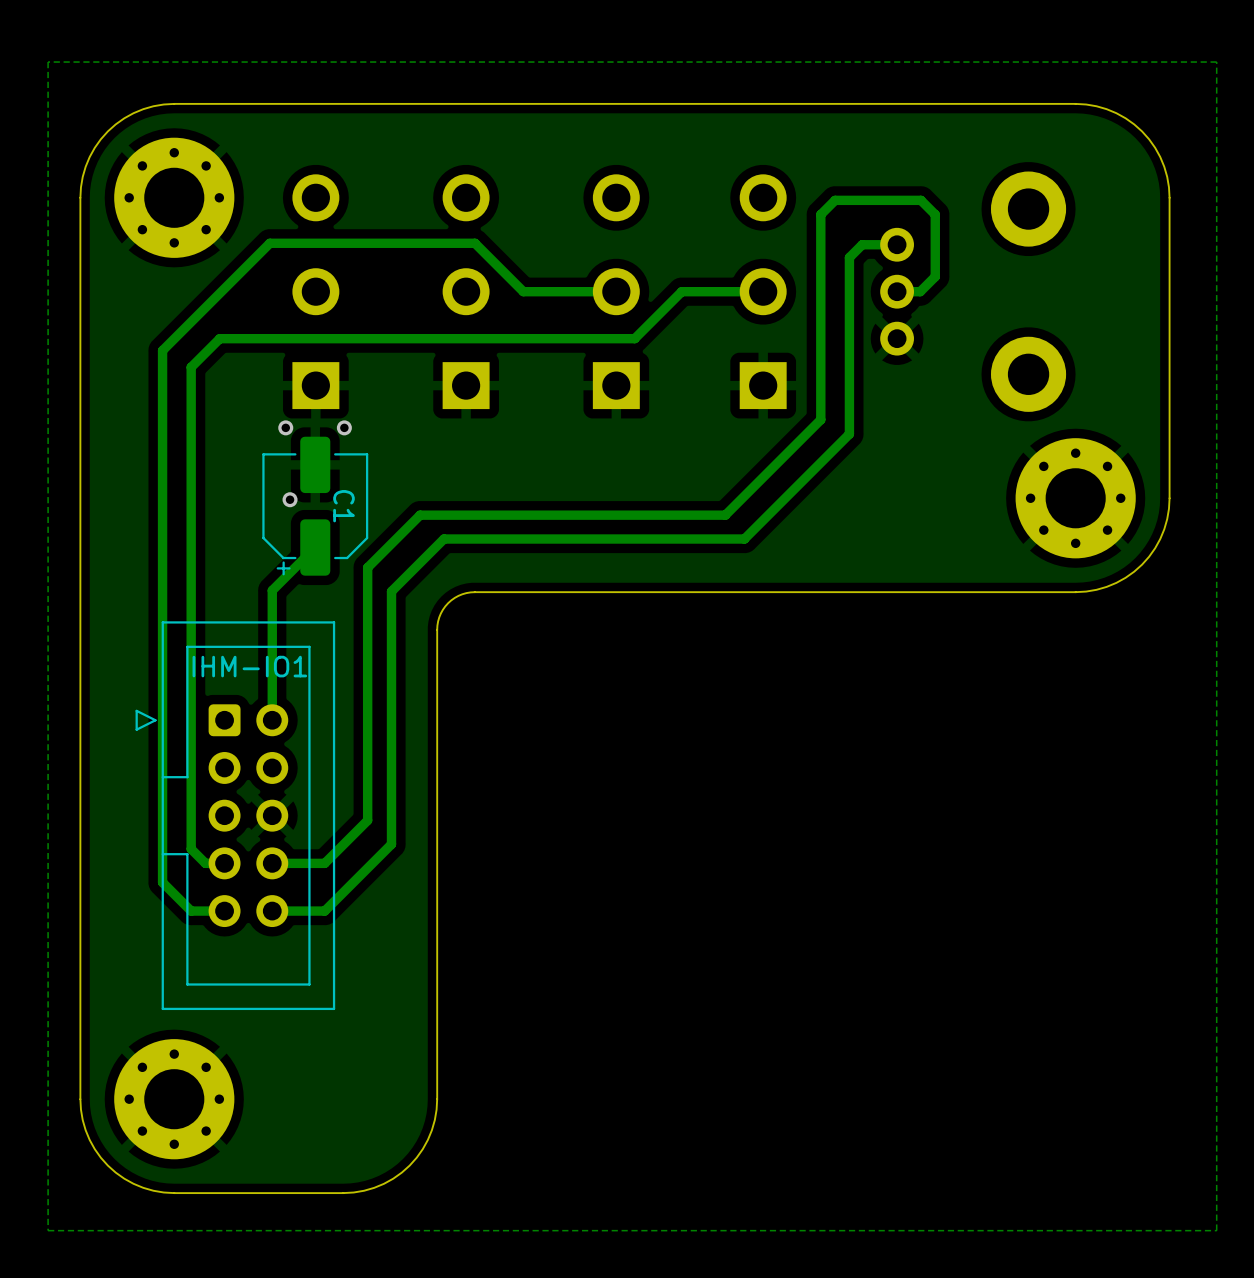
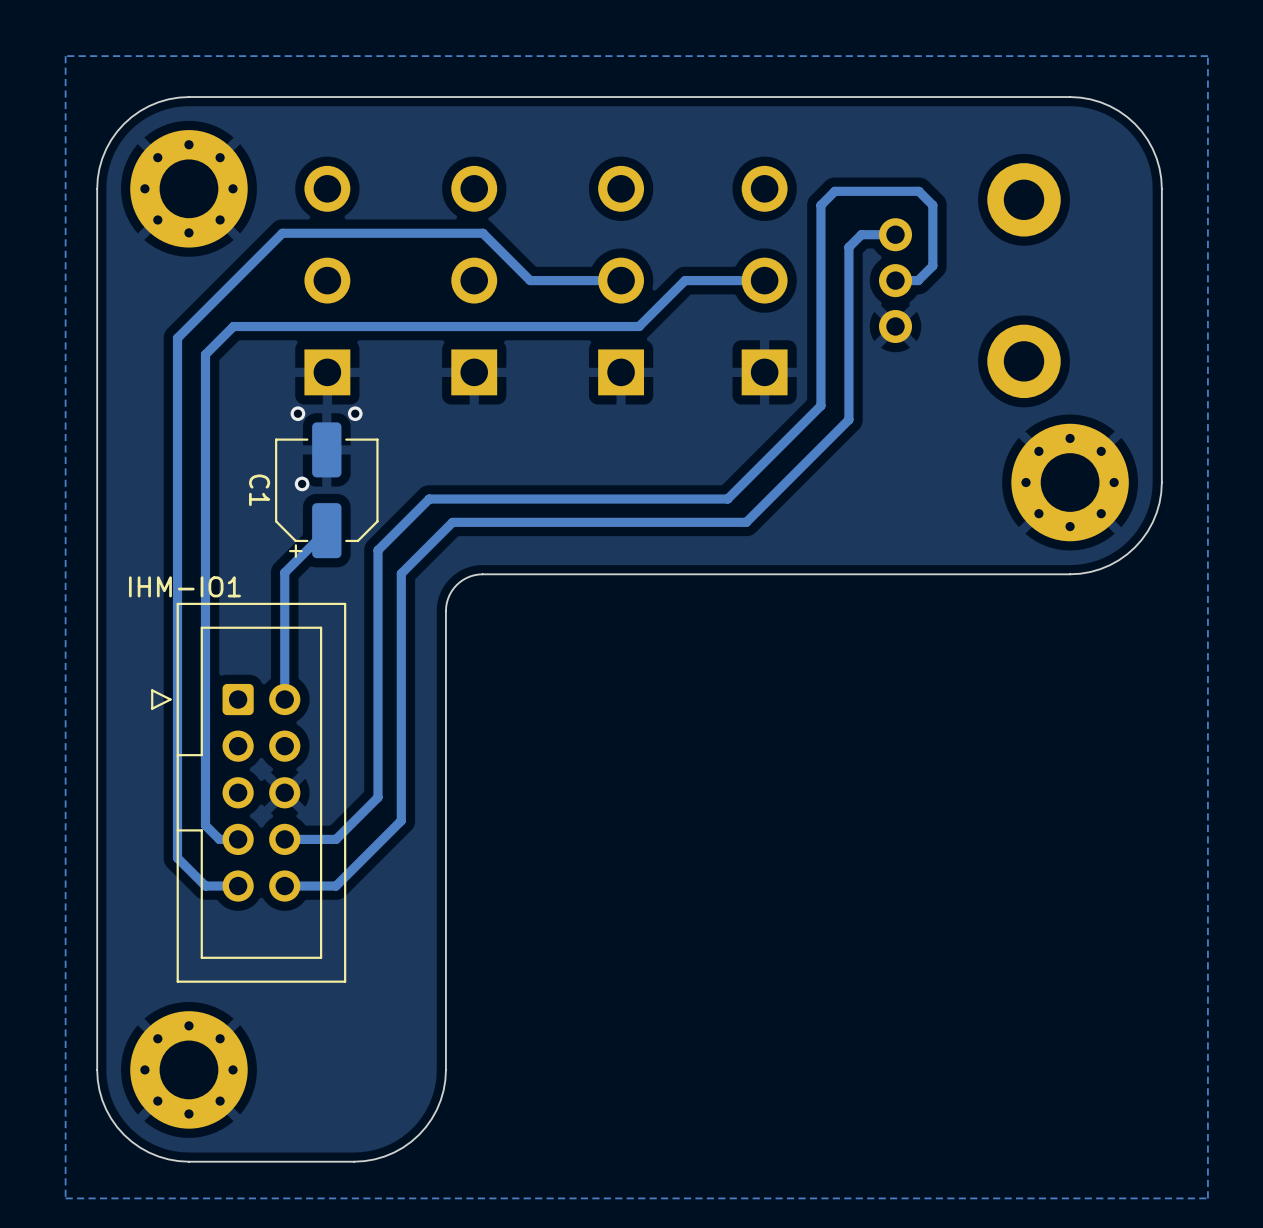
C1 name position: C1 (343, 506) -> C1 (259, 490)
IHM-IO1 name position: IHM-IO1 (249, 666) -> IHM-IO1 (184, 586)

